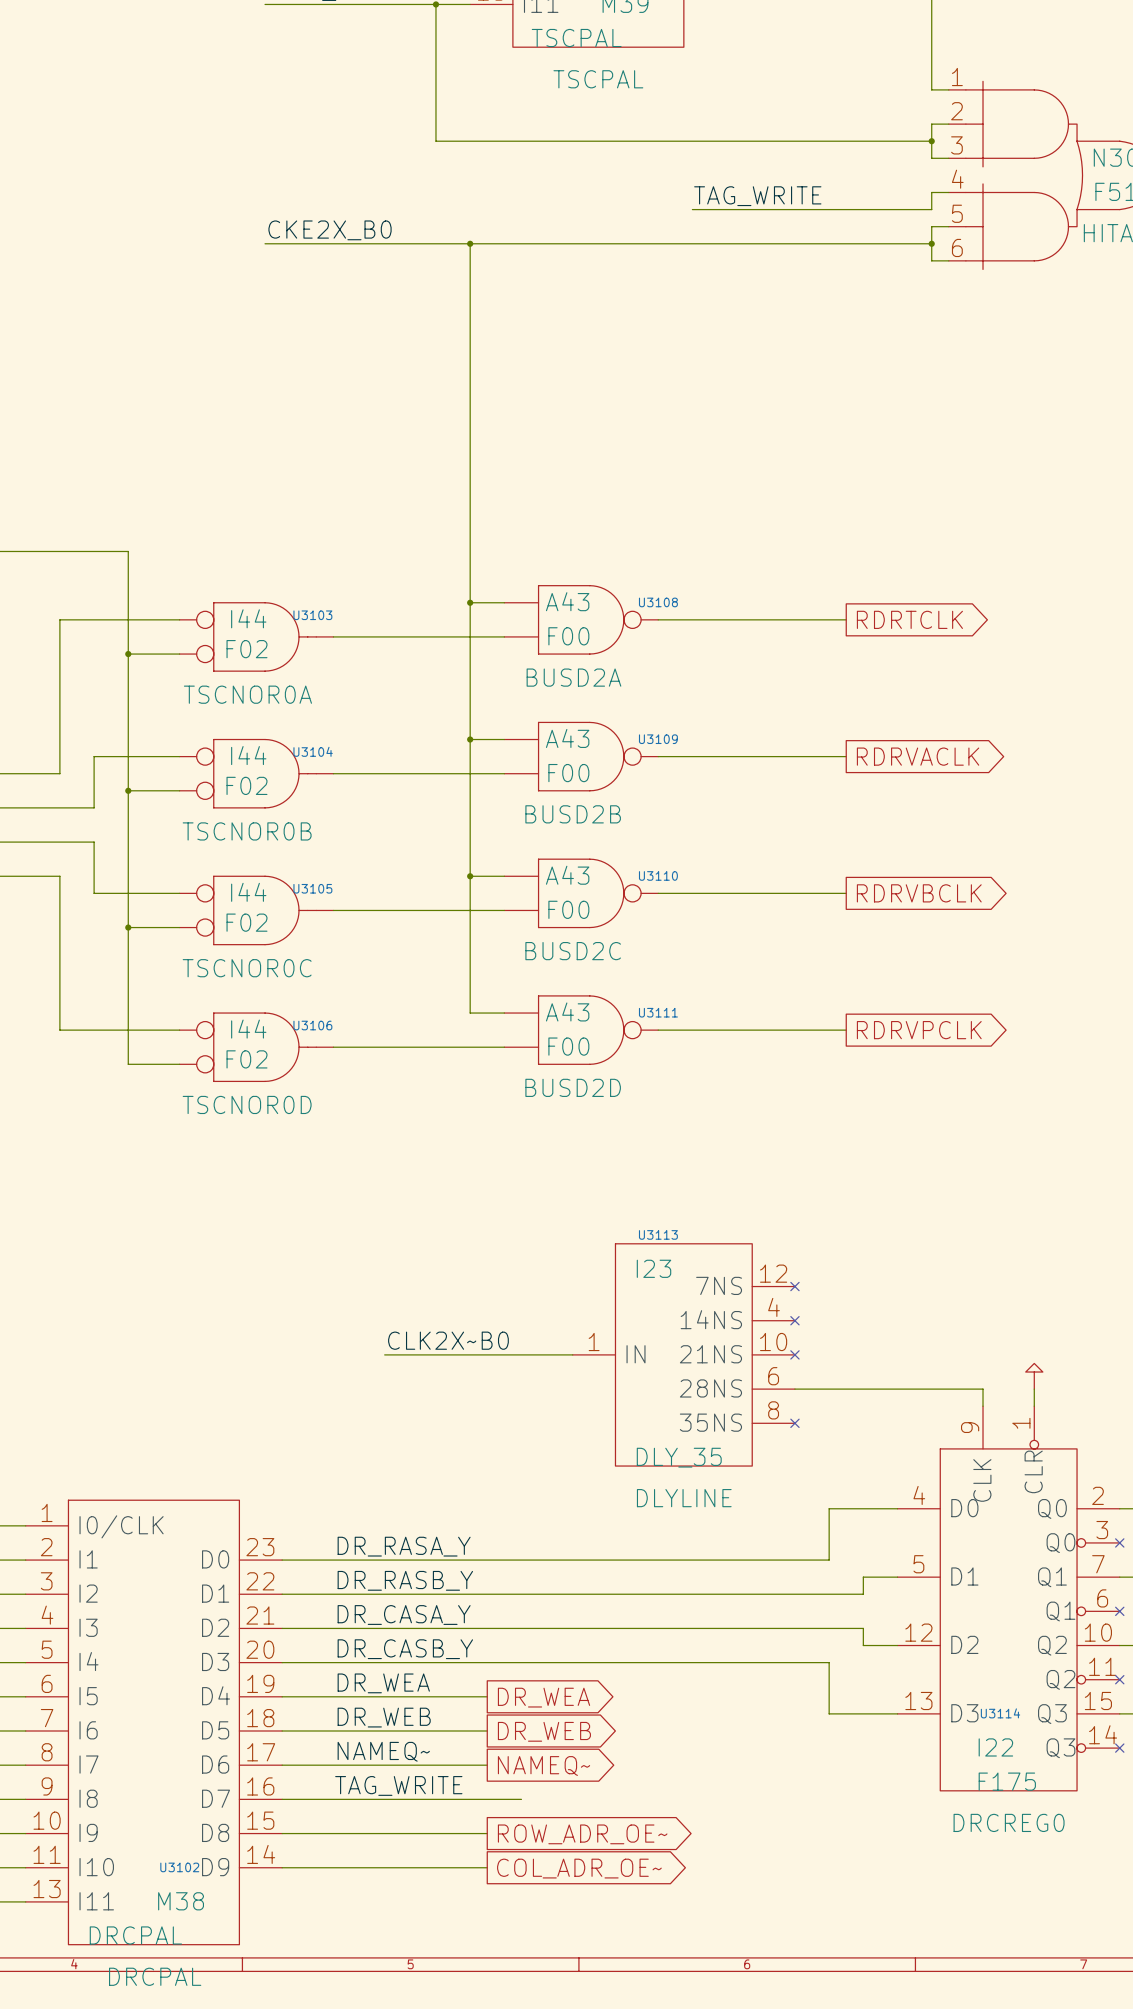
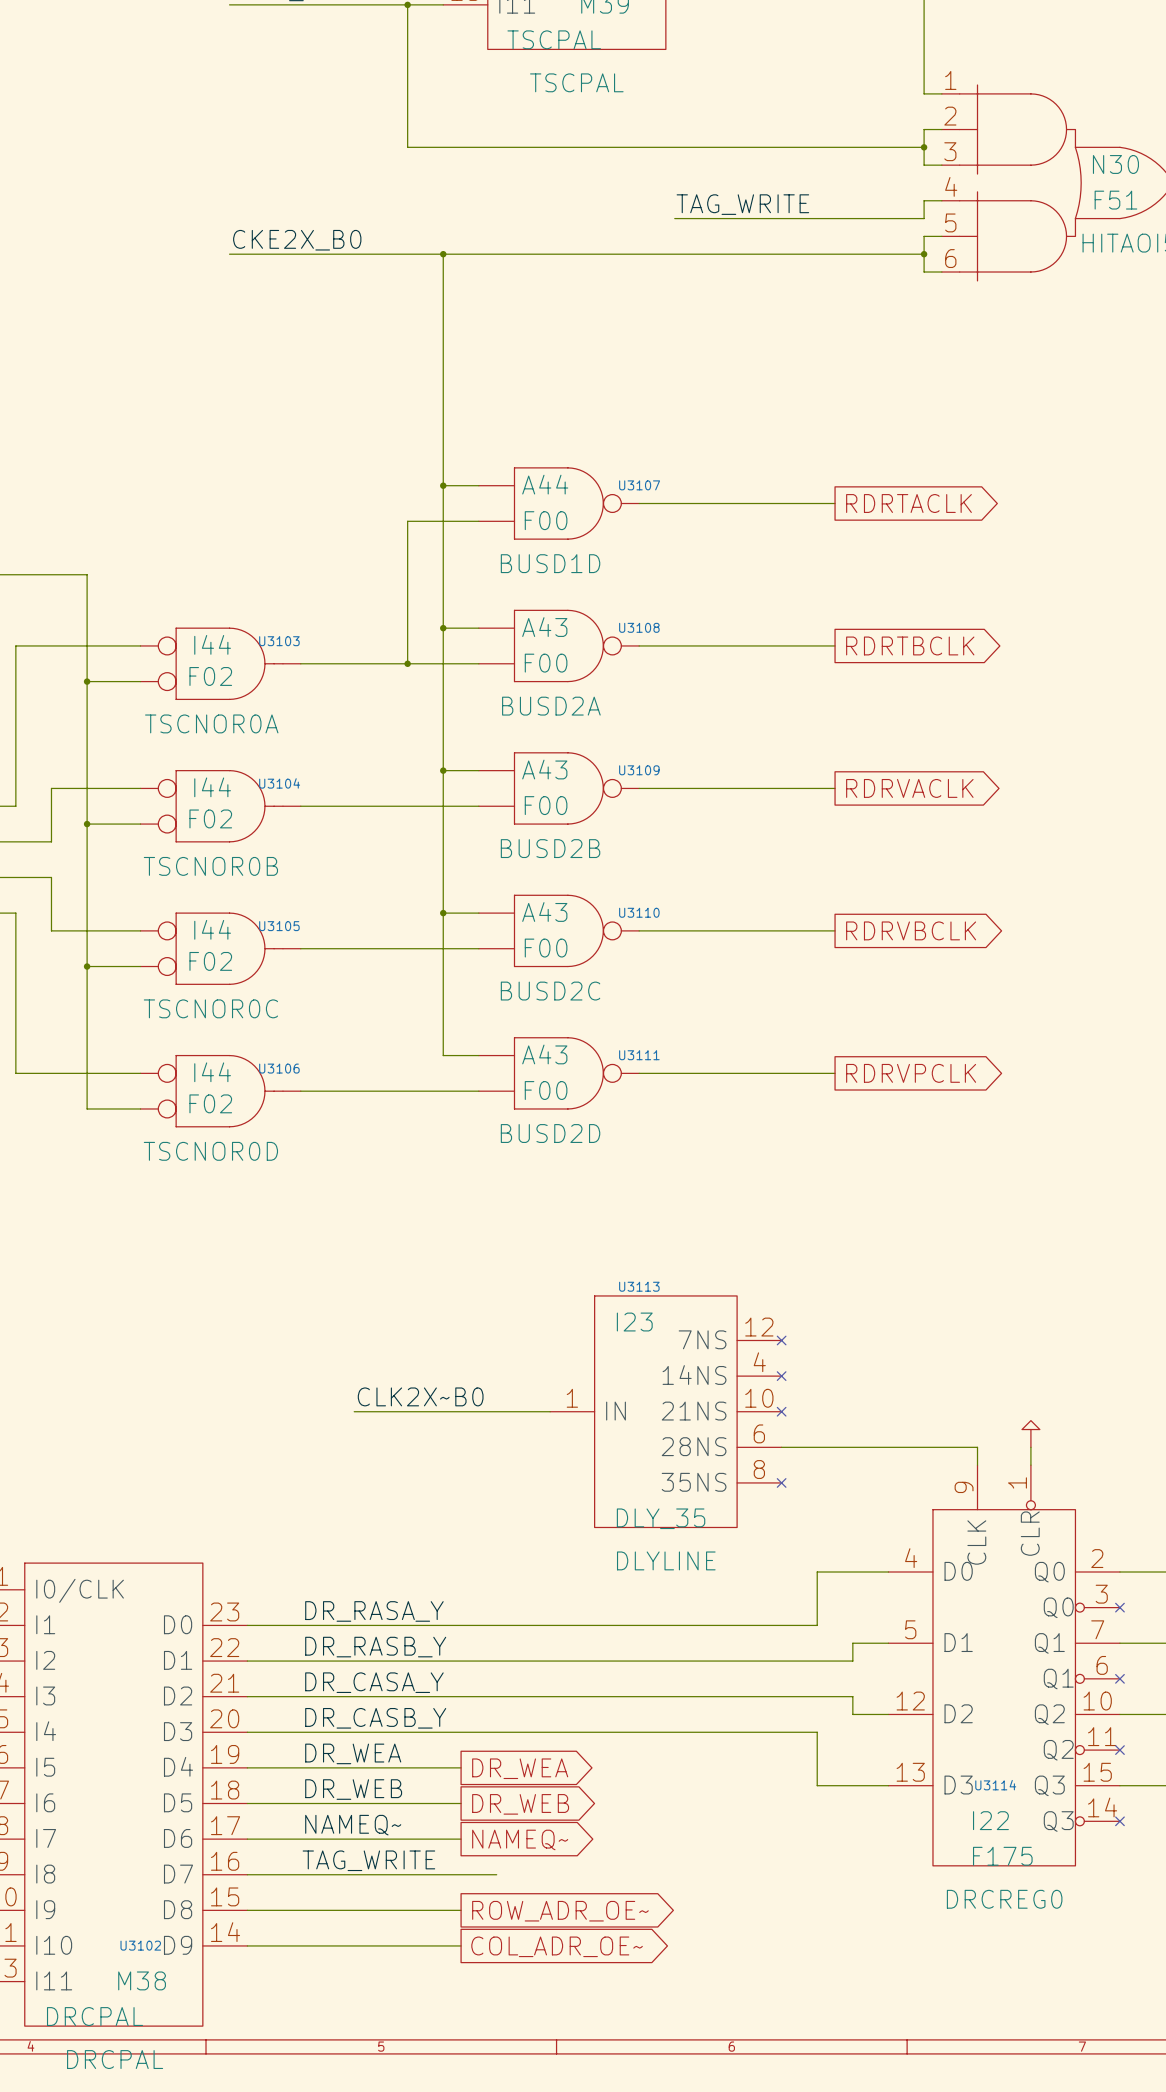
wire: none -> (443, 485) (478, 485)
junction: none -> (443, 485)
U3107: none -> F00 (559, 503)
wire: none -> (639, 503) (835, 503)
global label: none -> RDRTACLK (908, 503)
wire: none -> (478, 521) (407, 521) (407, 663)
global label: RDRTCLK (909, 619) -> RDRTBCLK (910, 645)
junction: none -> (407, 663)

